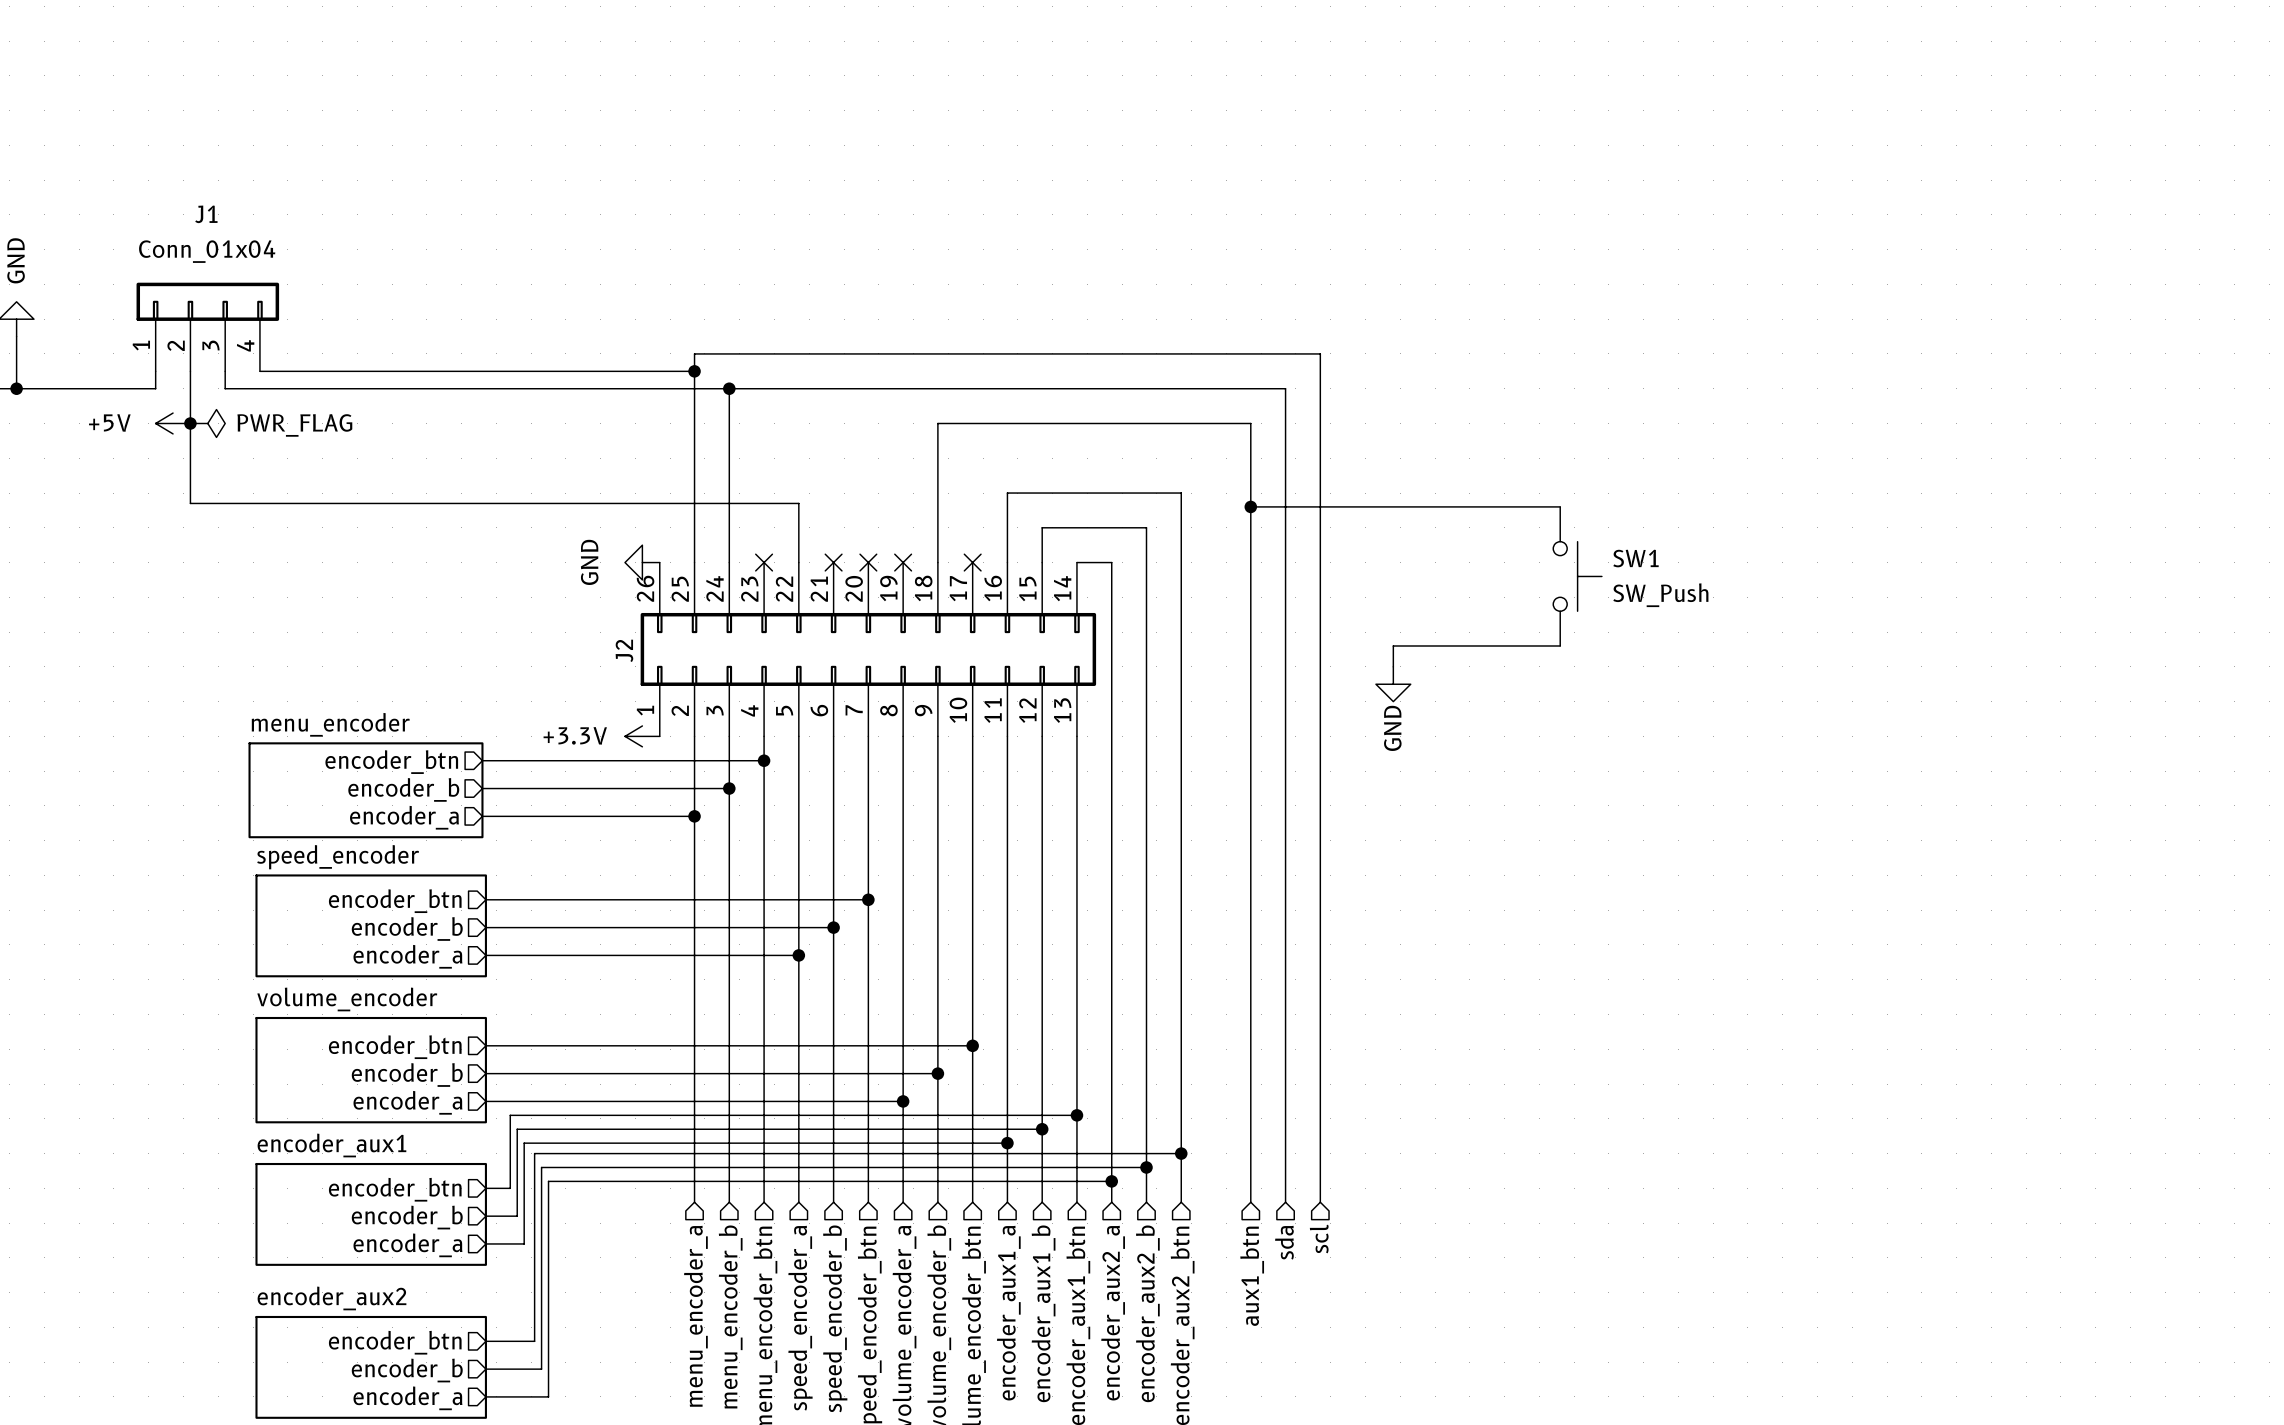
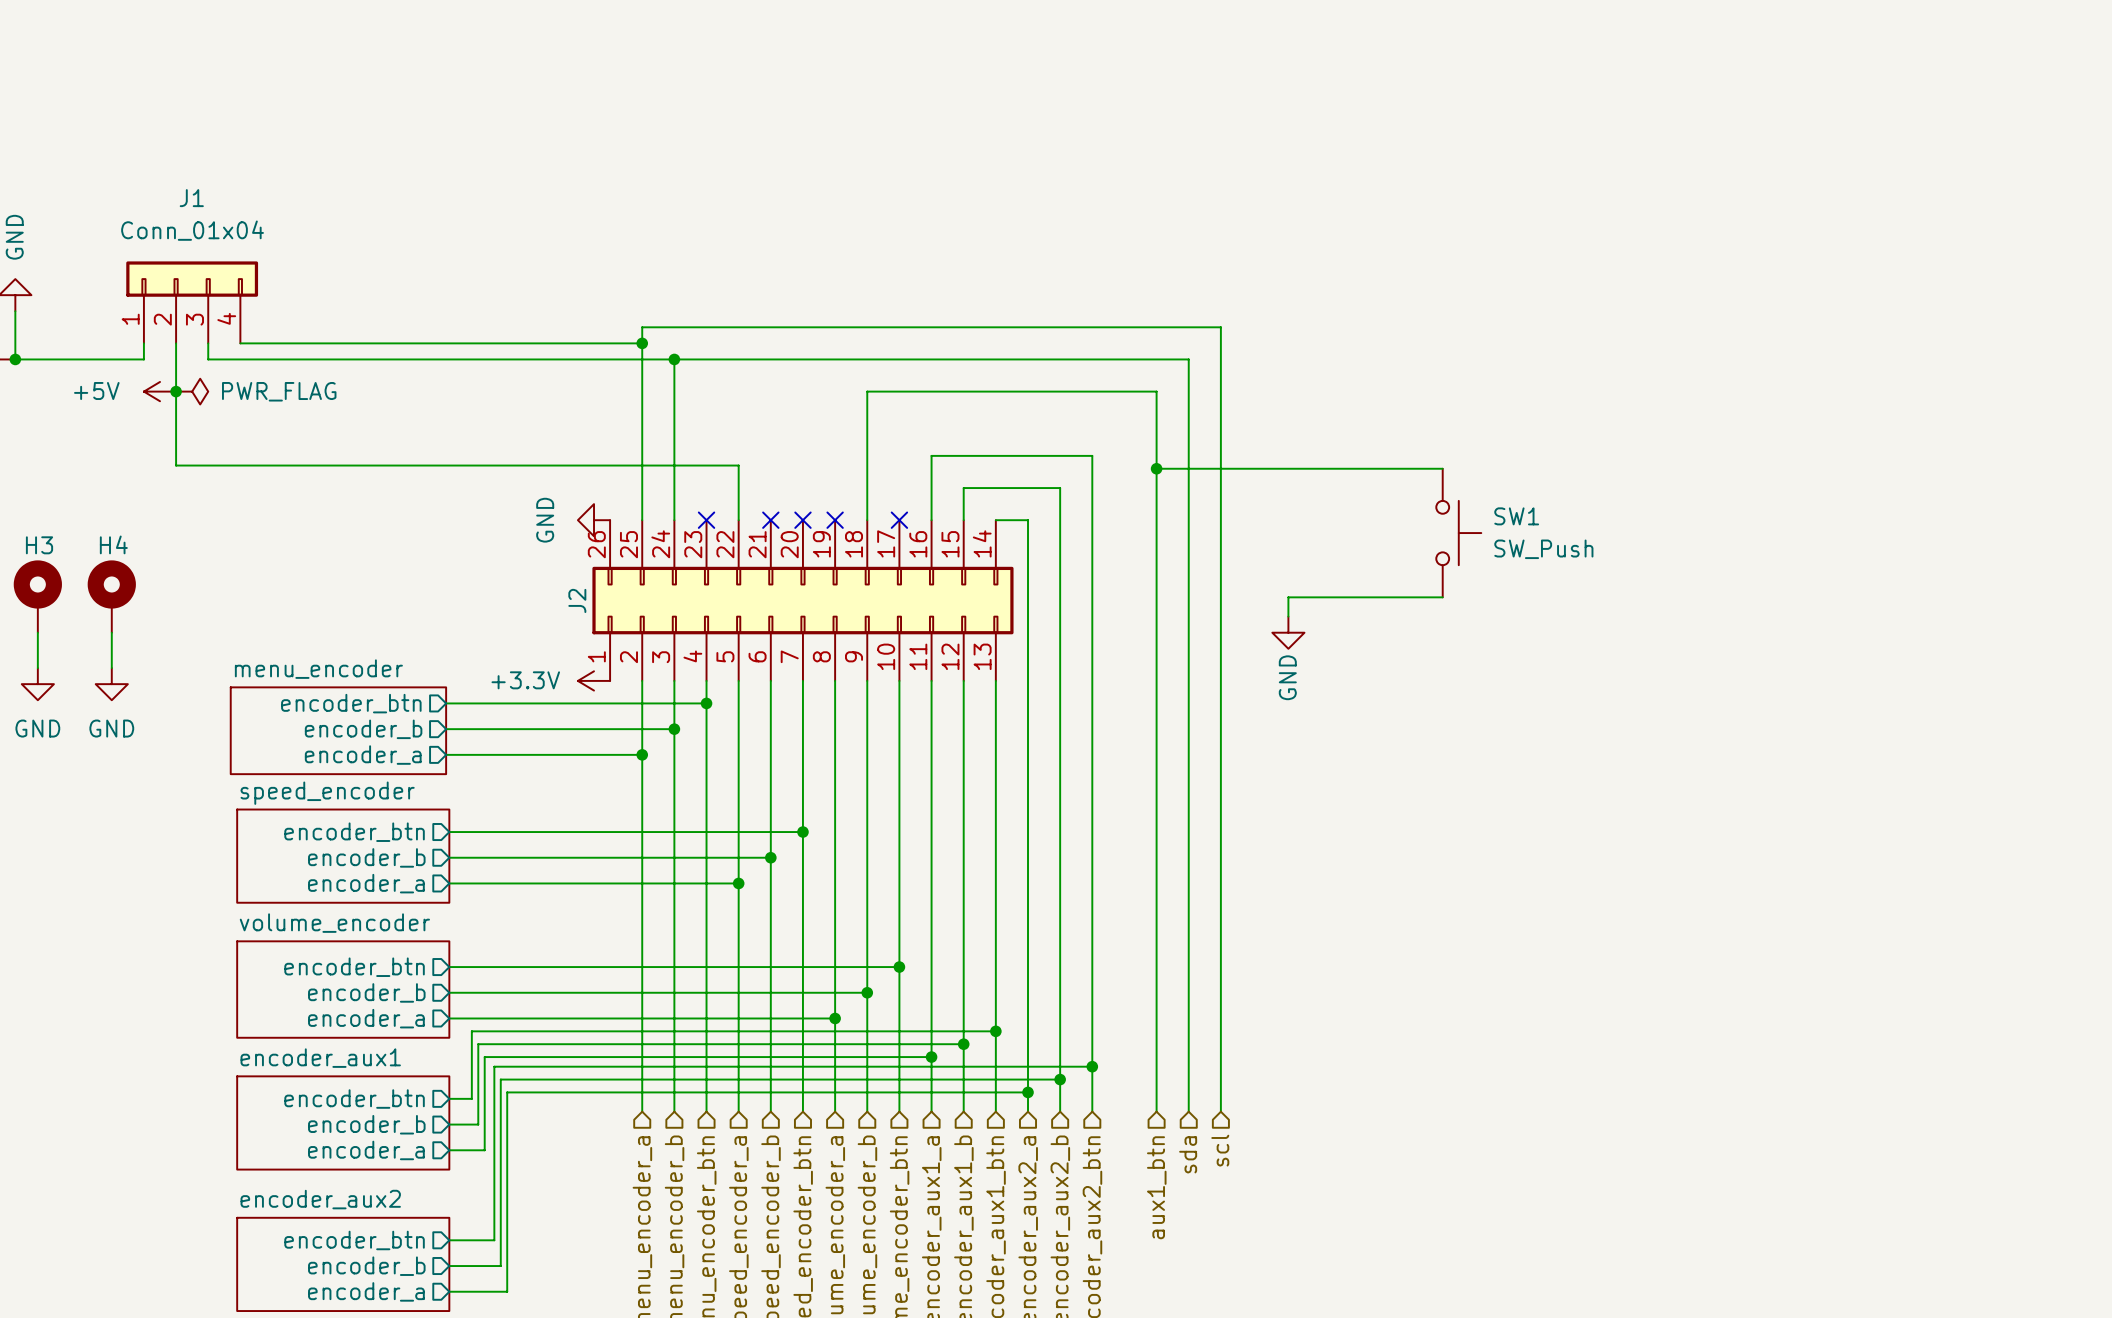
H3: none -> (37, 596)
H4: none -> (111, 596)
wire: none -> (37, 632) (37, 668)
wire: none -> (111, 632) (111, 668)
power symbol: none -> GND (37, 684)
power symbol: none -> GND (111, 684)

